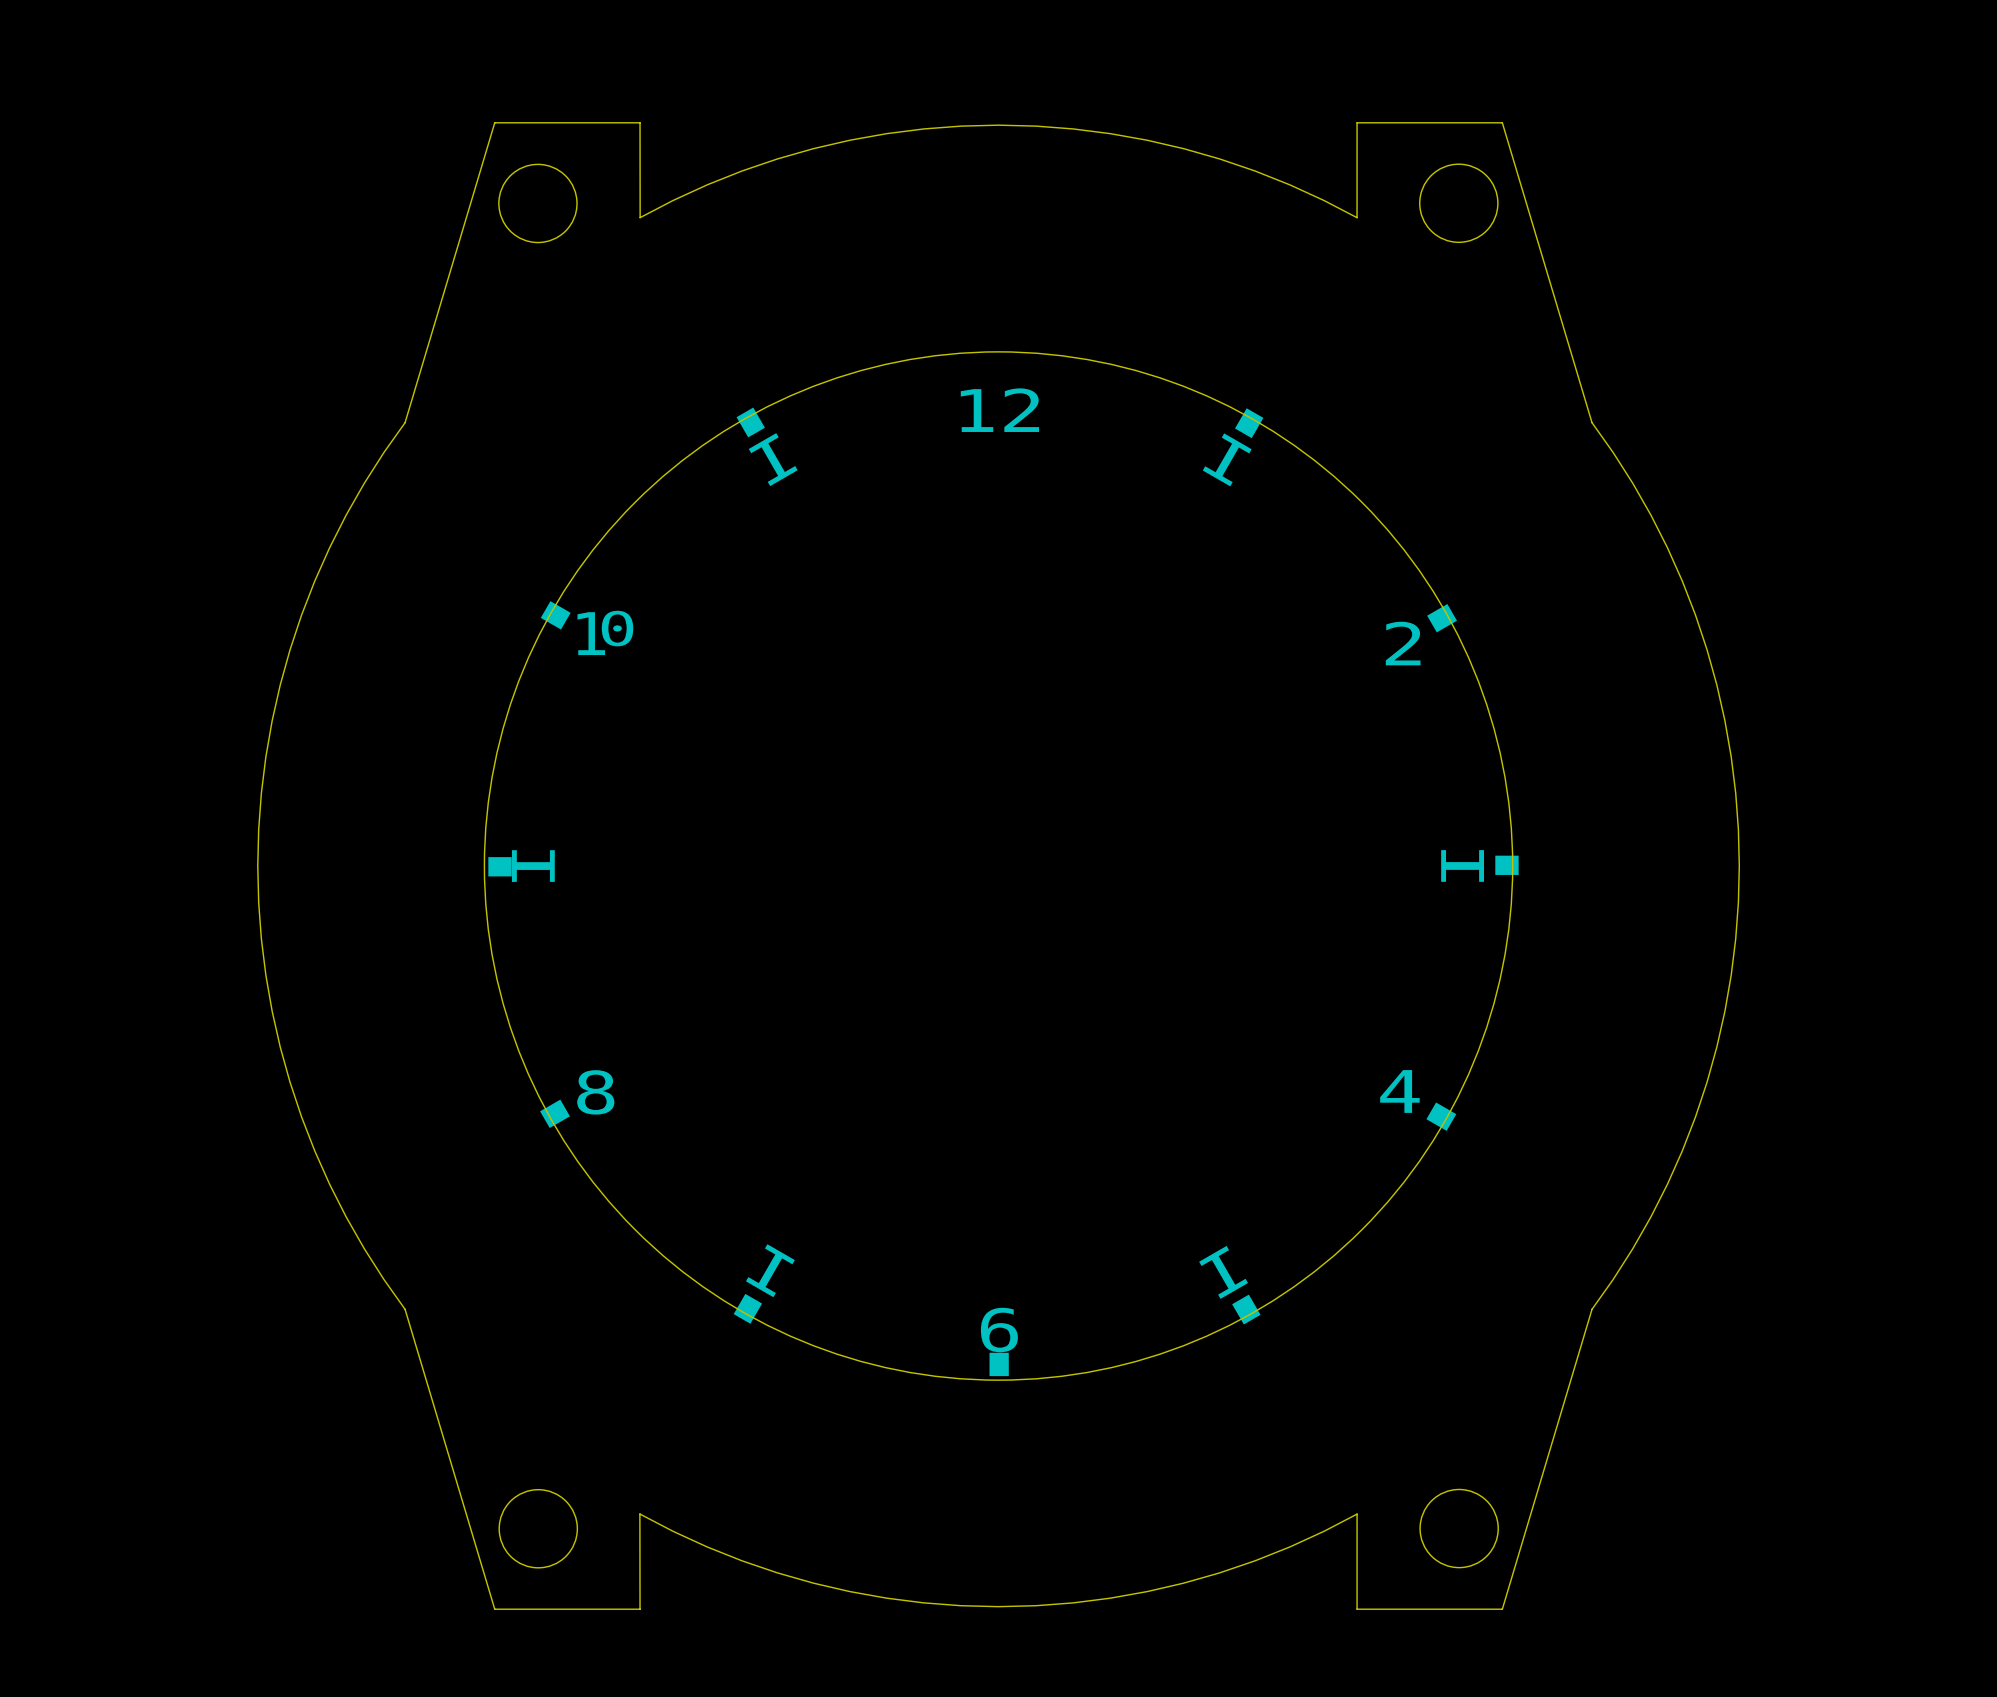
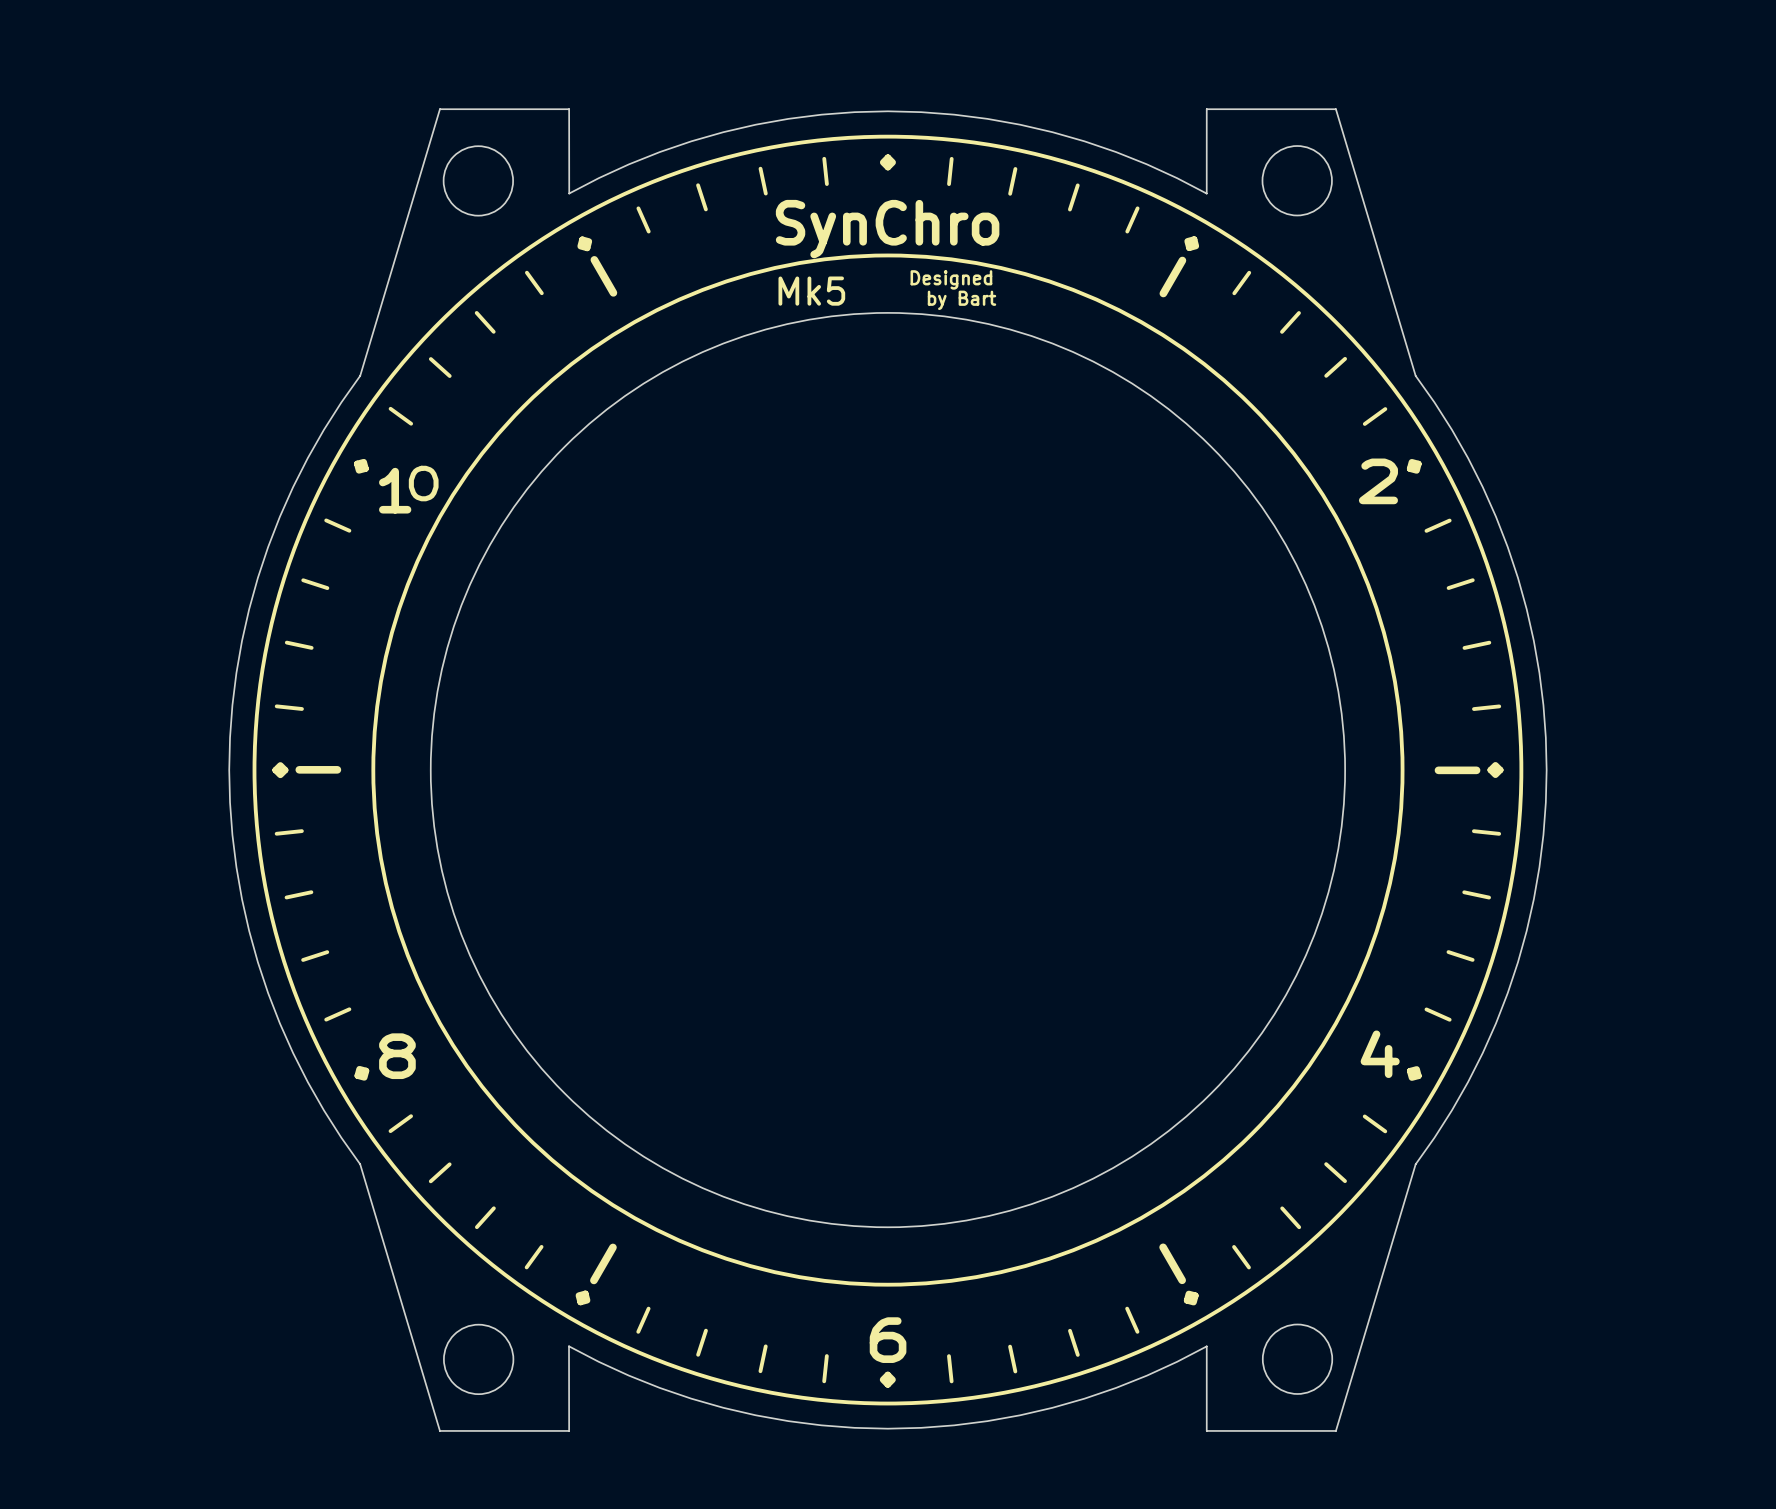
drawing: none -> [252, 134, 1524, 1406]
text: none -> . (887, 162)
text: none -> I (825, 171)
text: none -> I (950, 171)
text: none -> I (763, 181)
text: none -> I (1012, 181)
text: none -> I (701, 197)
text: none -> I (1073, 197)
text: none -> I (643, 219)
text: none -> I (1132, 219)
text: none -> SynChro (887, 229)
text: none -> I (603, 276)
text: none -> I (1172, 277)
text: none -> Designed (951, 279)
text: none -> I (534, 282)
text: none -> I (1241, 283)
text: none -> Mk5 (811, 291)
text: none -> by Bart (962, 300)
text: none -> I (485, 322)
text: none -> I (1290, 322)
text: 12 (999, 410) -> none
text: none -> I (440, 367)
text: none -> I (1335, 367)
text position: . (750, 422) -> . (584, 243)
text position: . (1249, 423) -> . (1191, 243)
text: I (773, 459) -> none
text: I (1227, 459) -> none
text: none -> I (400, 416)
text: none -> I (1375, 416)
text: none -> I (337, 525)
text: none -> I (1438, 525)
text position: . (555, 615) -> . (361, 466)
text position: . (1442, 618) -> . (1414, 466)
text position: 0 (617, 628) -> 0 (423, 483)
text position: 1 (591, 633) -> 1 (395, 490)
text position: 2 (1403, 643) -> 2 (1378, 481)
text: none -> I (315, 584)
text: none -> I (1460, 584)
text: none -> I (299, 645)
text: none -> I (1476, 645)
text: none -> I (289, 707)
text: none -> I (1486, 707)
text: none -> I (318, 769)
text: I (1462, 865) -> none
text position: . (1506, 865) -> . (1495, 770)
text: none -> . (280, 770)
text: . (499, 866) -> none
text: I (533, 866) -> none
text: none -> I (1457, 770)
text: none -> I (289, 832)
text: none -> I (1486, 832)
text: none -> I (298, 894)
text: none -> I (1476, 894)
text: none -> I (315, 956)
text: none -> I (1460, 955)
text position: 4 (1399, 1091) -> 4 (1380, 1054)
text position: 8 (595, 1092) -> 8 (397, 1056)
text position: . (555, 1113) -> . (361, 1073)
text position: . (1441, 1116) -> . (1414, 1073)
text: none -> I (337, 1014)
text: none -> I (1438, 1014)
text: none -> I (400, 1123)
text: none -> I (1375, 1123)
text: I (770, 1270) -> none
text: I (1223, 1272) -> none
text rotation: 0° (747, 1308) -> 180° (582, 1297)
text rotation: 0° (1246, 1309) -> 90° counterclockwise (1191, 1298)
text: none -> I (440, 1172)
text: none -> I (1335, 1172)
text position: 6 (999, 1330) -> 6 (888, 1340)
text position: . (999, 1364) -> . (887, 1379)
text: none -> I (485, 1217)
text: none -> I (1290, 1217)
text: none -> I (534, 1257)
text: none -> I (1241, 1257)
text: none -> I (603, 1263)
text: none -> I (1172, 1263)
text: none -> I (643, 1320)
text: none -> I (1132, 1320)
text: none -> I (702, 1342)
text: none -> I (1073, 1342)
text: none -> I (763, 1358)
text: none -> I (1012, 1359)
text: none -> I (825, 1368)
text: none -> I (950, 1368)

